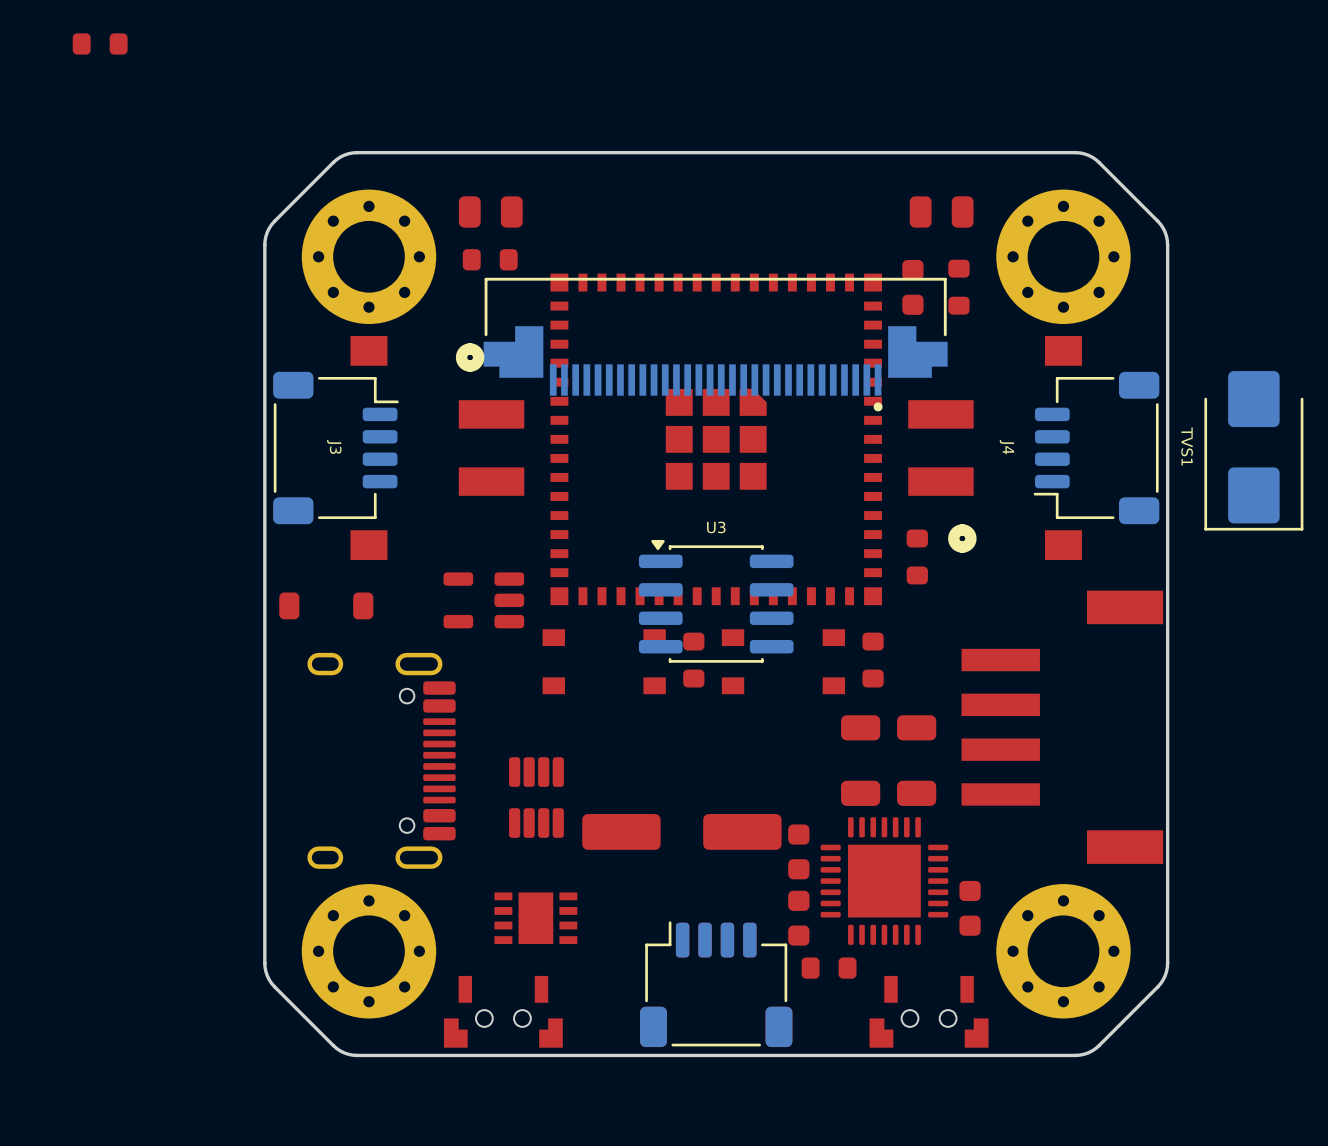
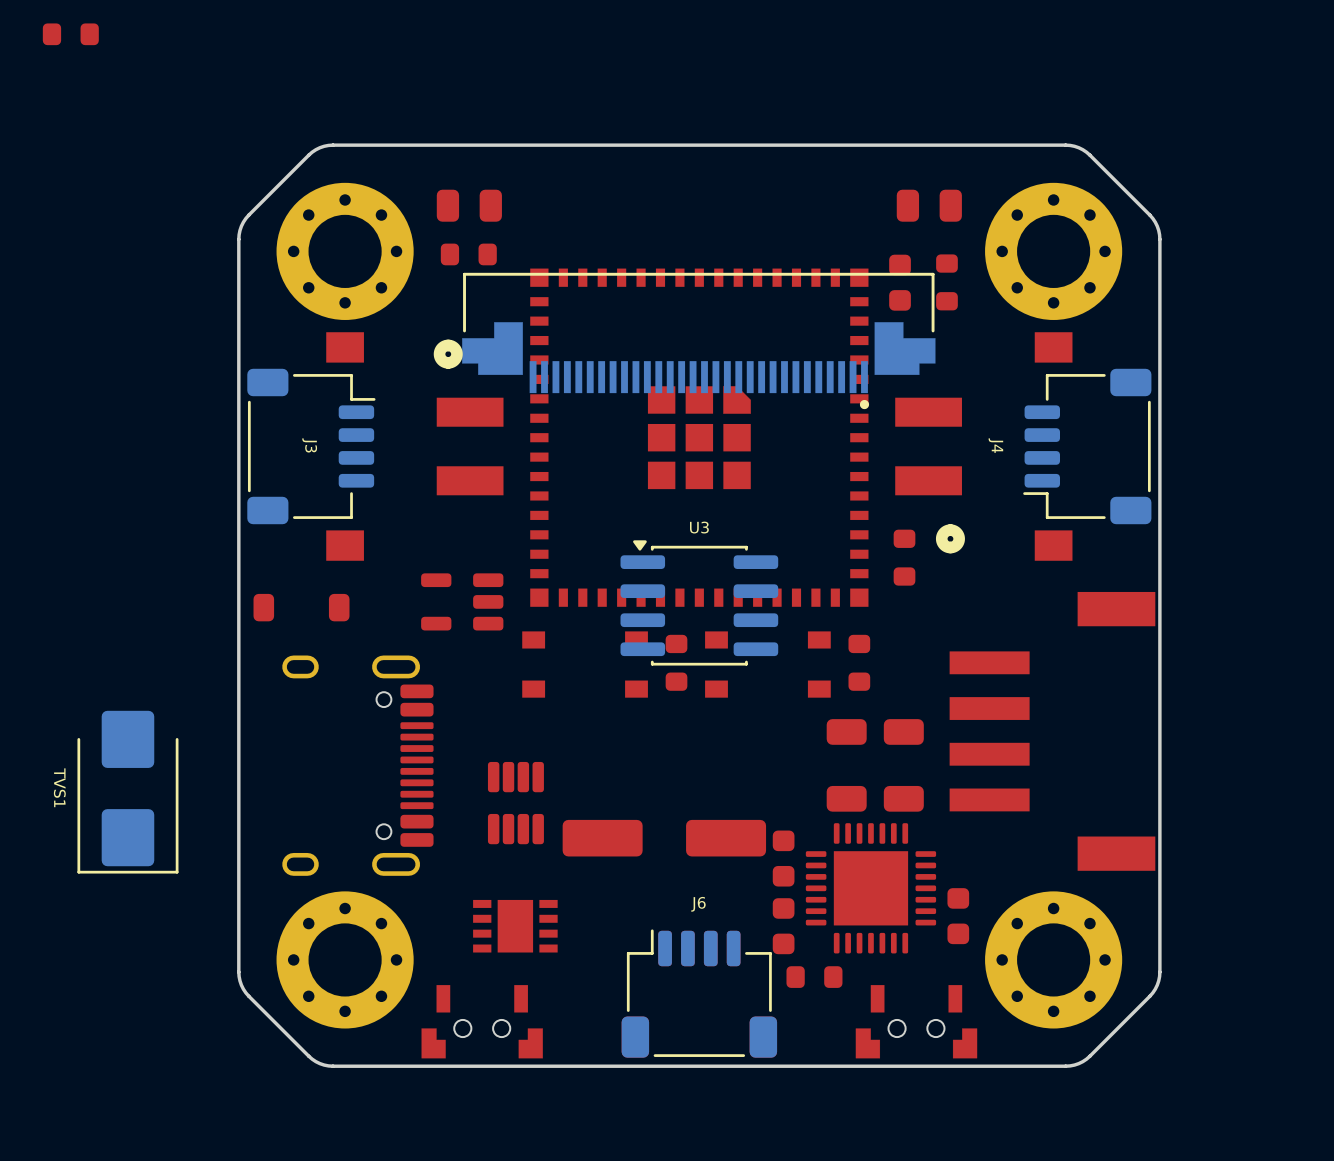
TVS1 position: (1253, 450) -> (127, 792)
J6 name: none -> J6 (698, 904)

